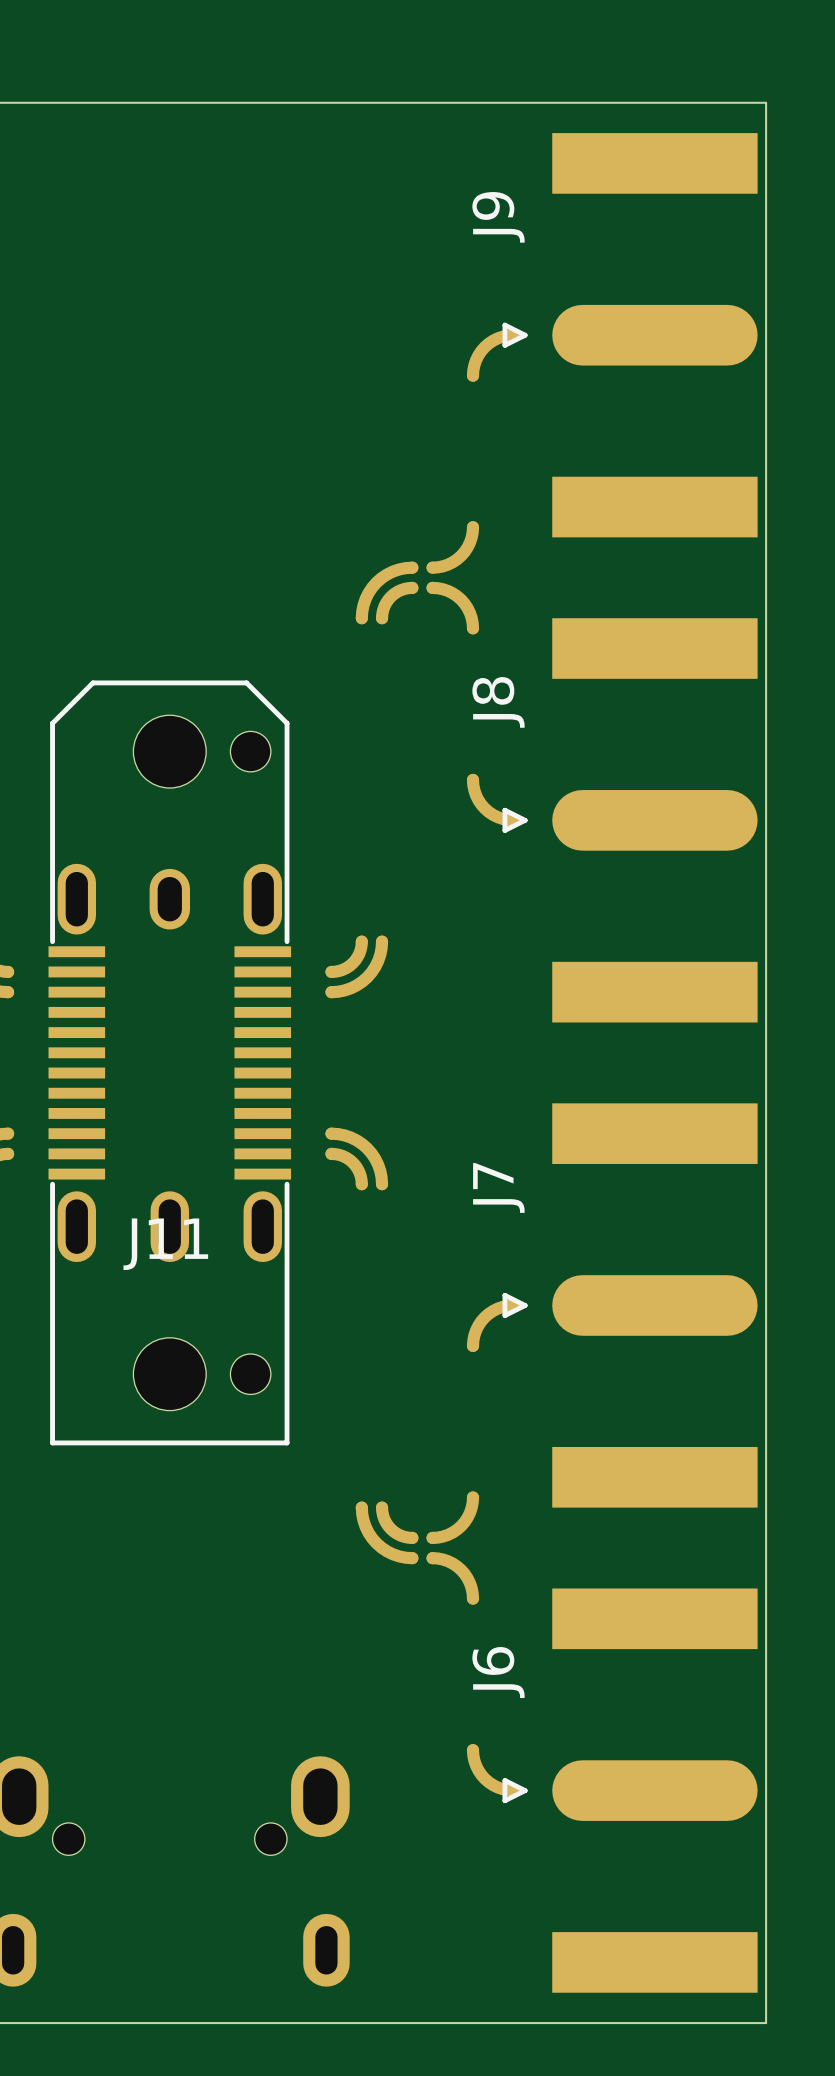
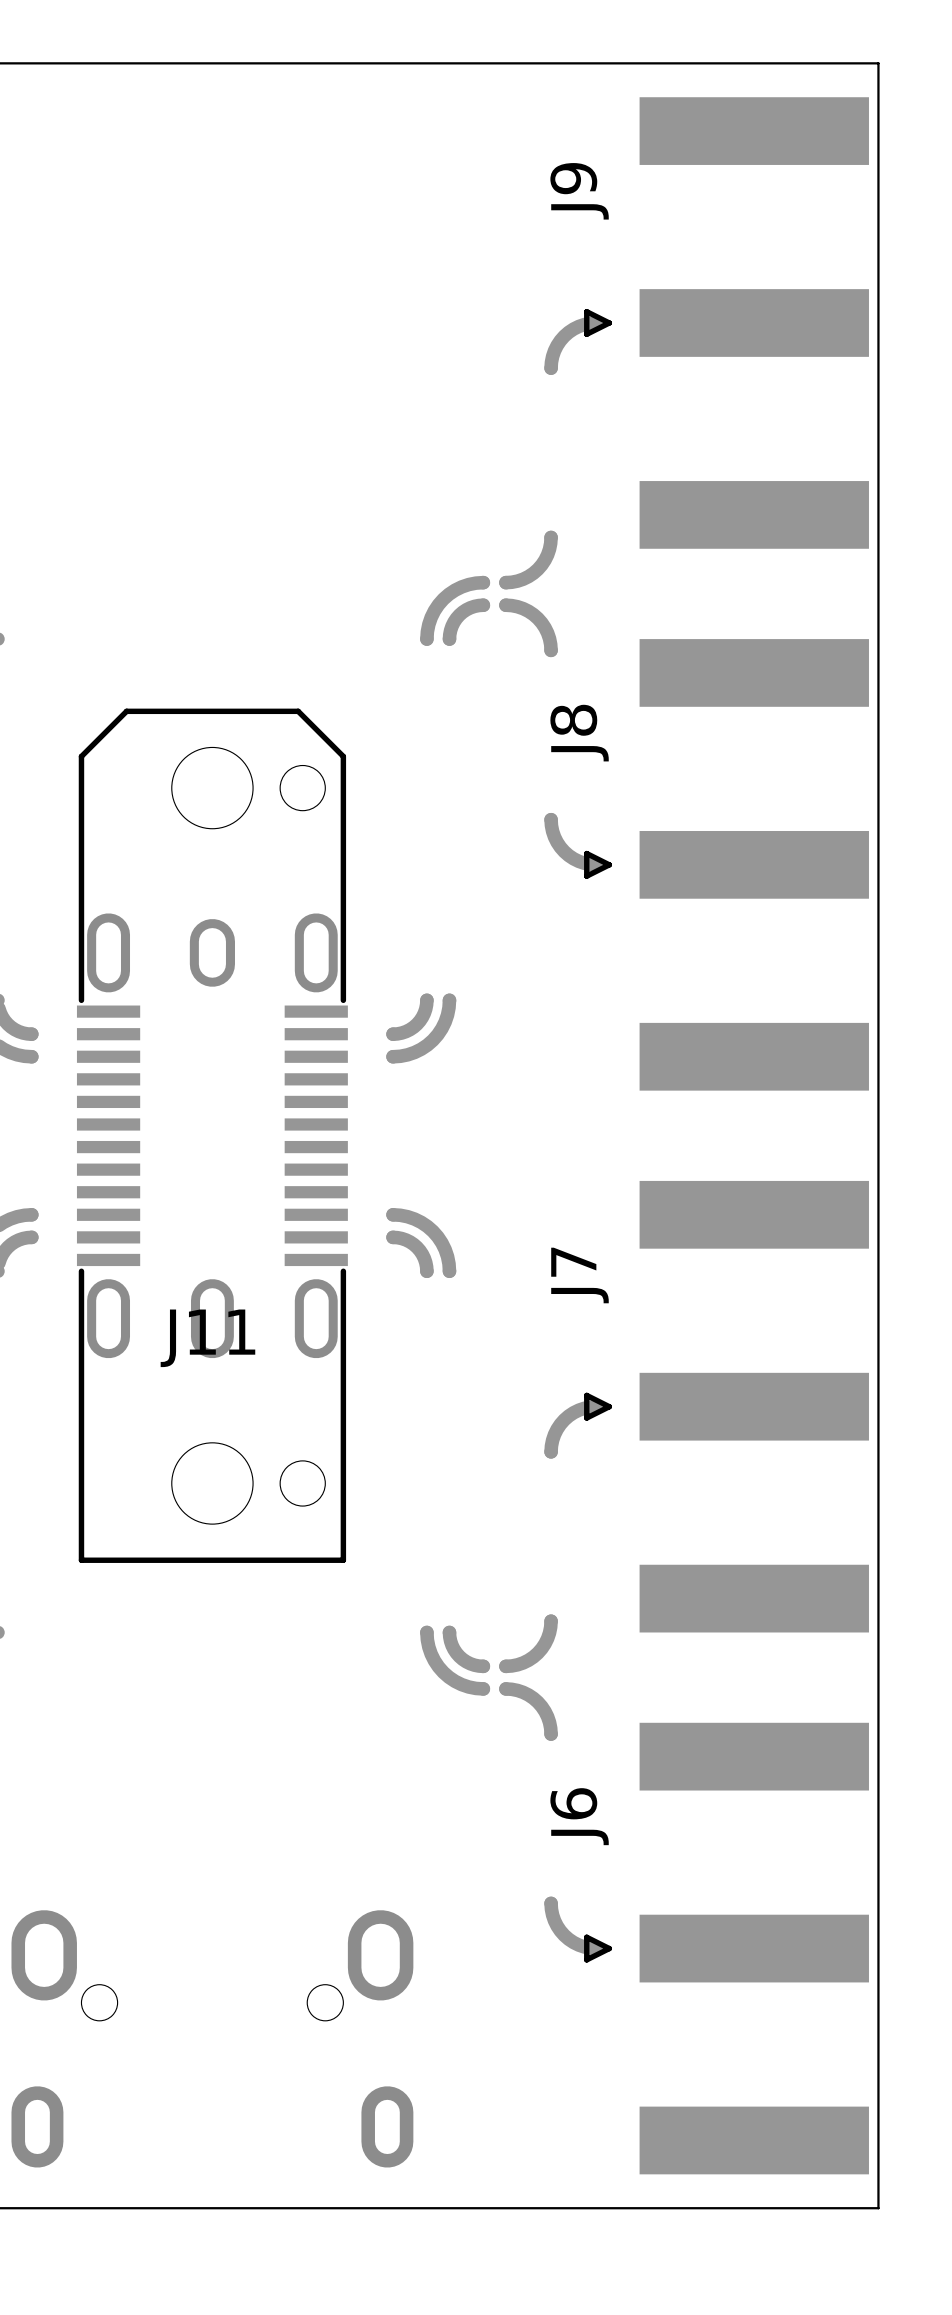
J9 footprint: [502, 133, 758, 538] -> [584, 97, 869, 549]
J8 footprint: [502, 618, 758, 1023] -> [584, 639, 869, 1091]
J7 footprint: [502, 1103, 758, 1508] -> [584, 1180, 869, 1633]
J6 footprint: [502, 1588, 758, 1993] -> [584, 1722, 869, 2175]

